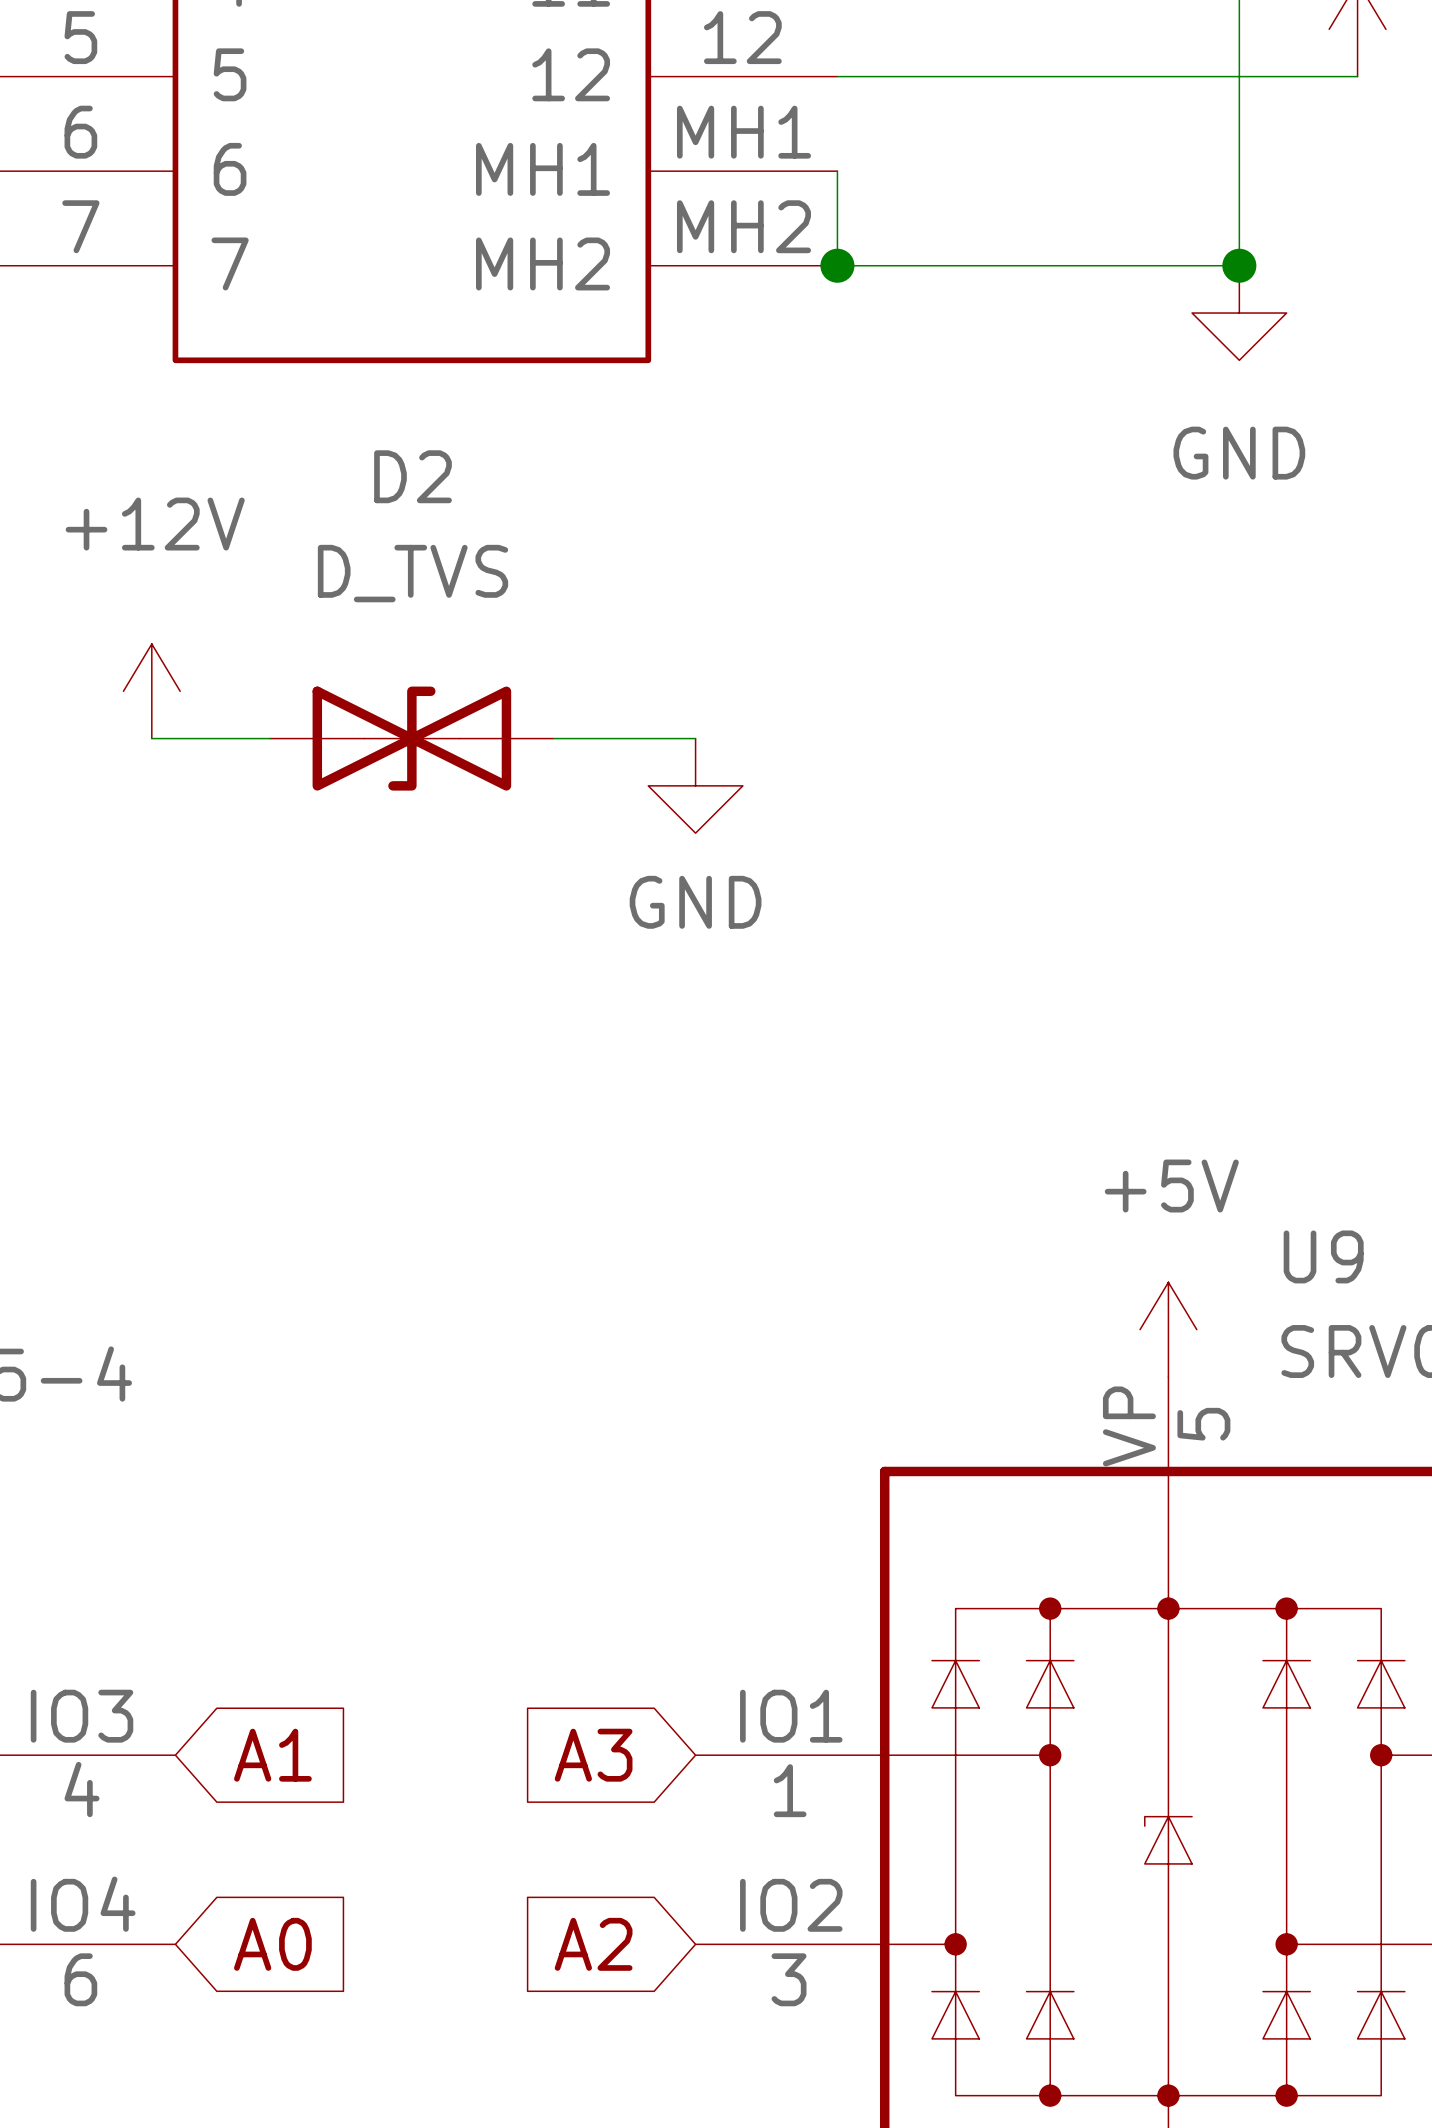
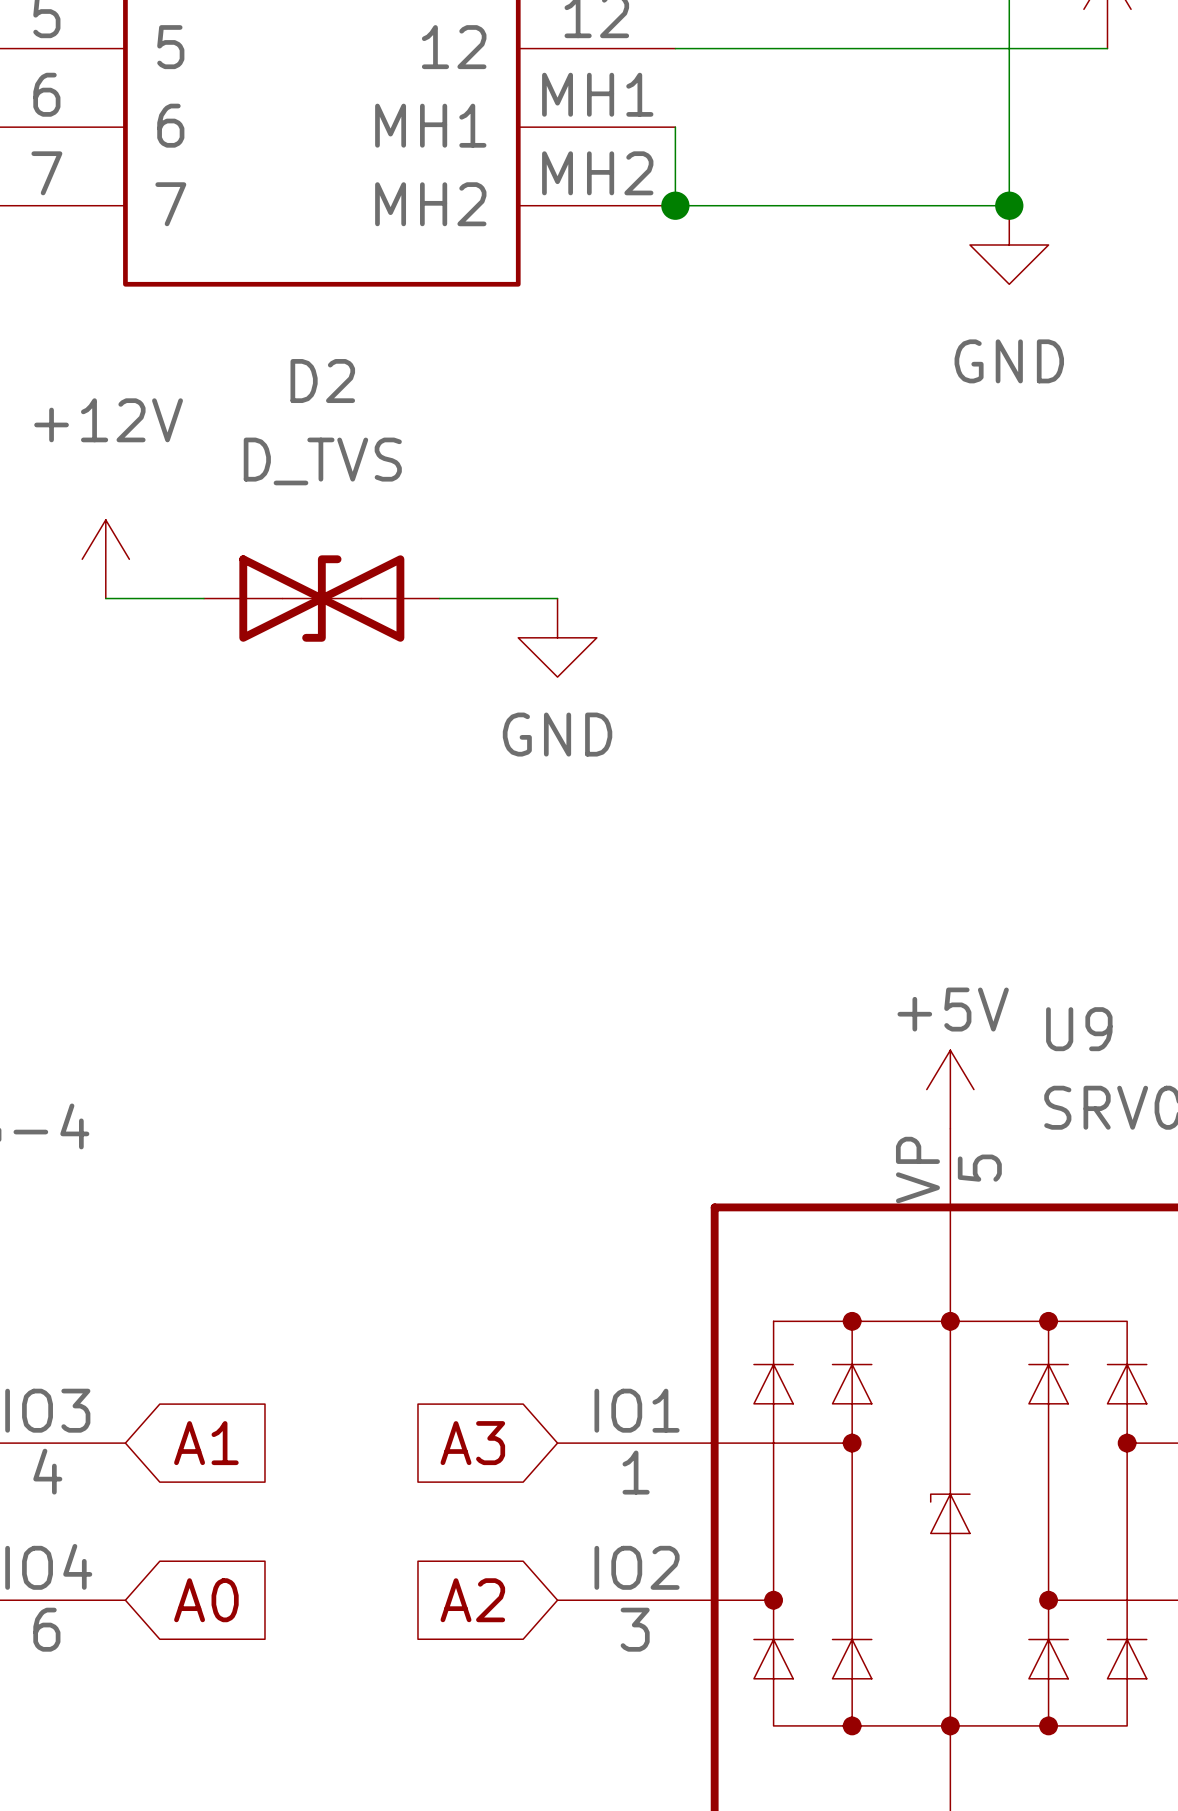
power symbol text position: +5V (1171, 1186) -> +5V (953, 1009)

